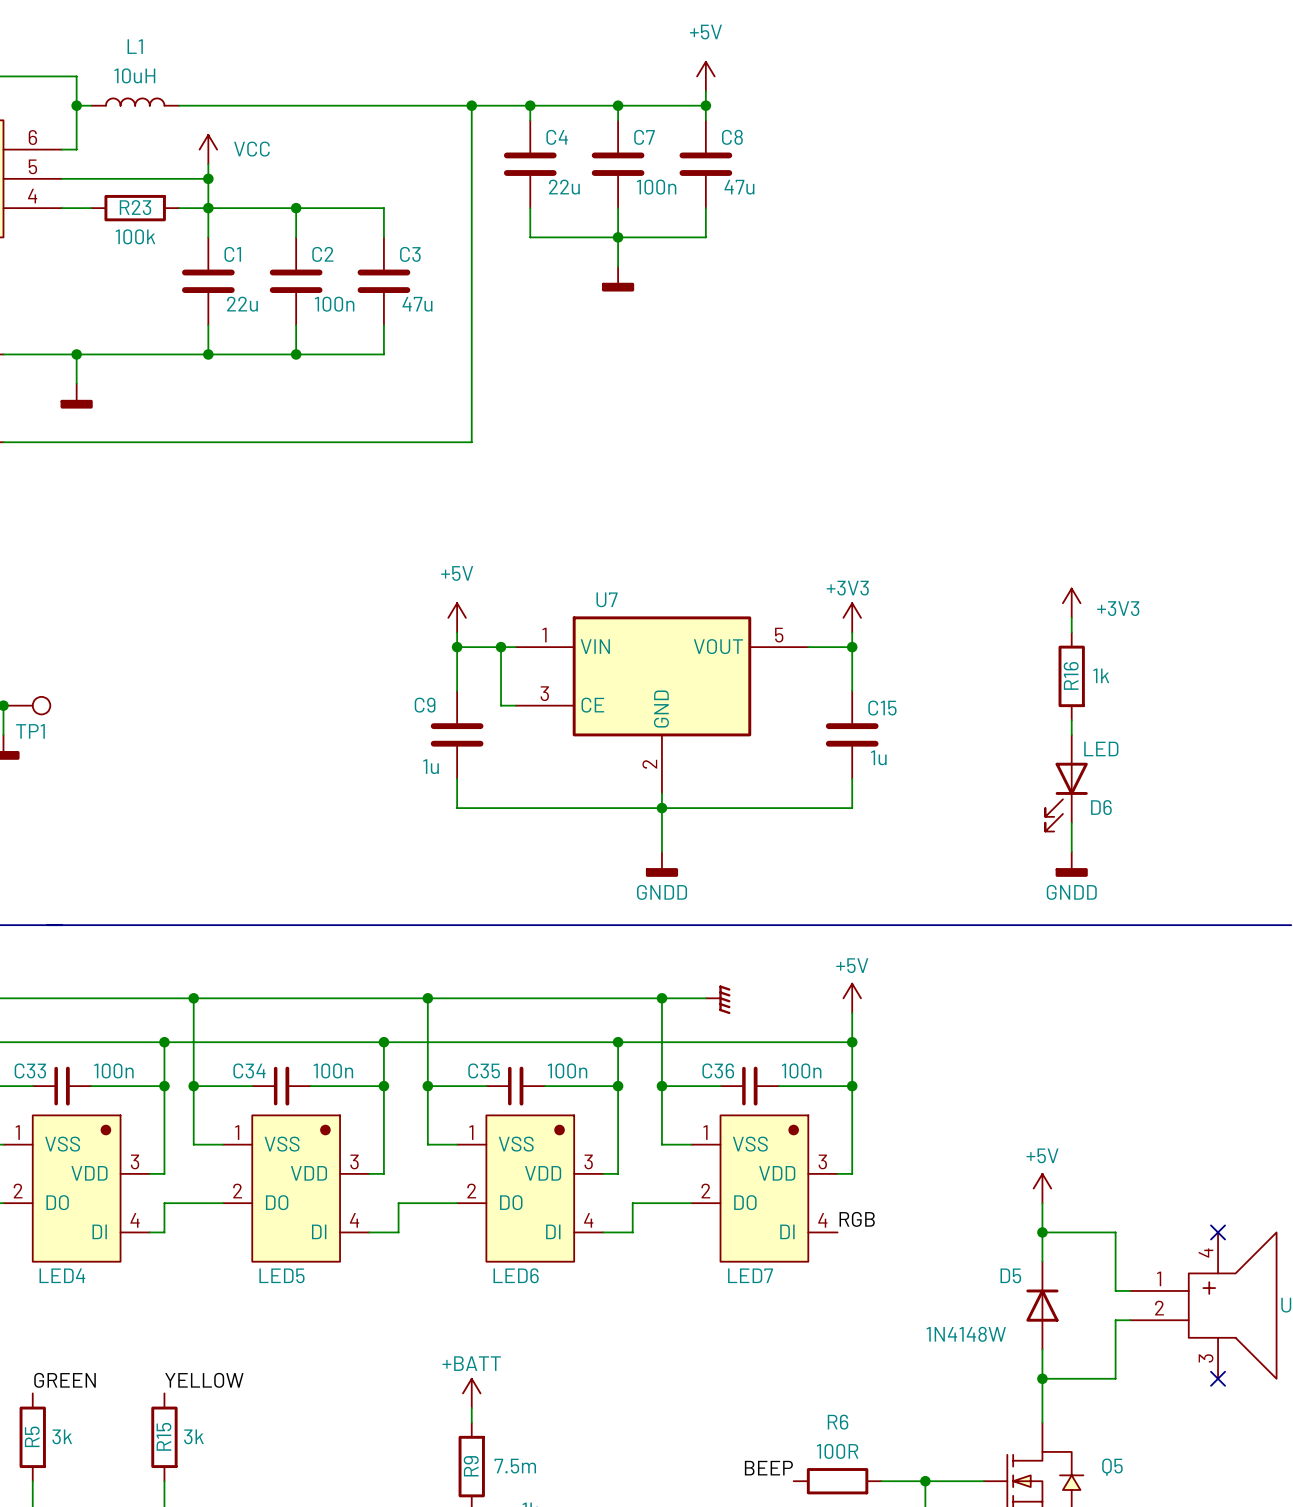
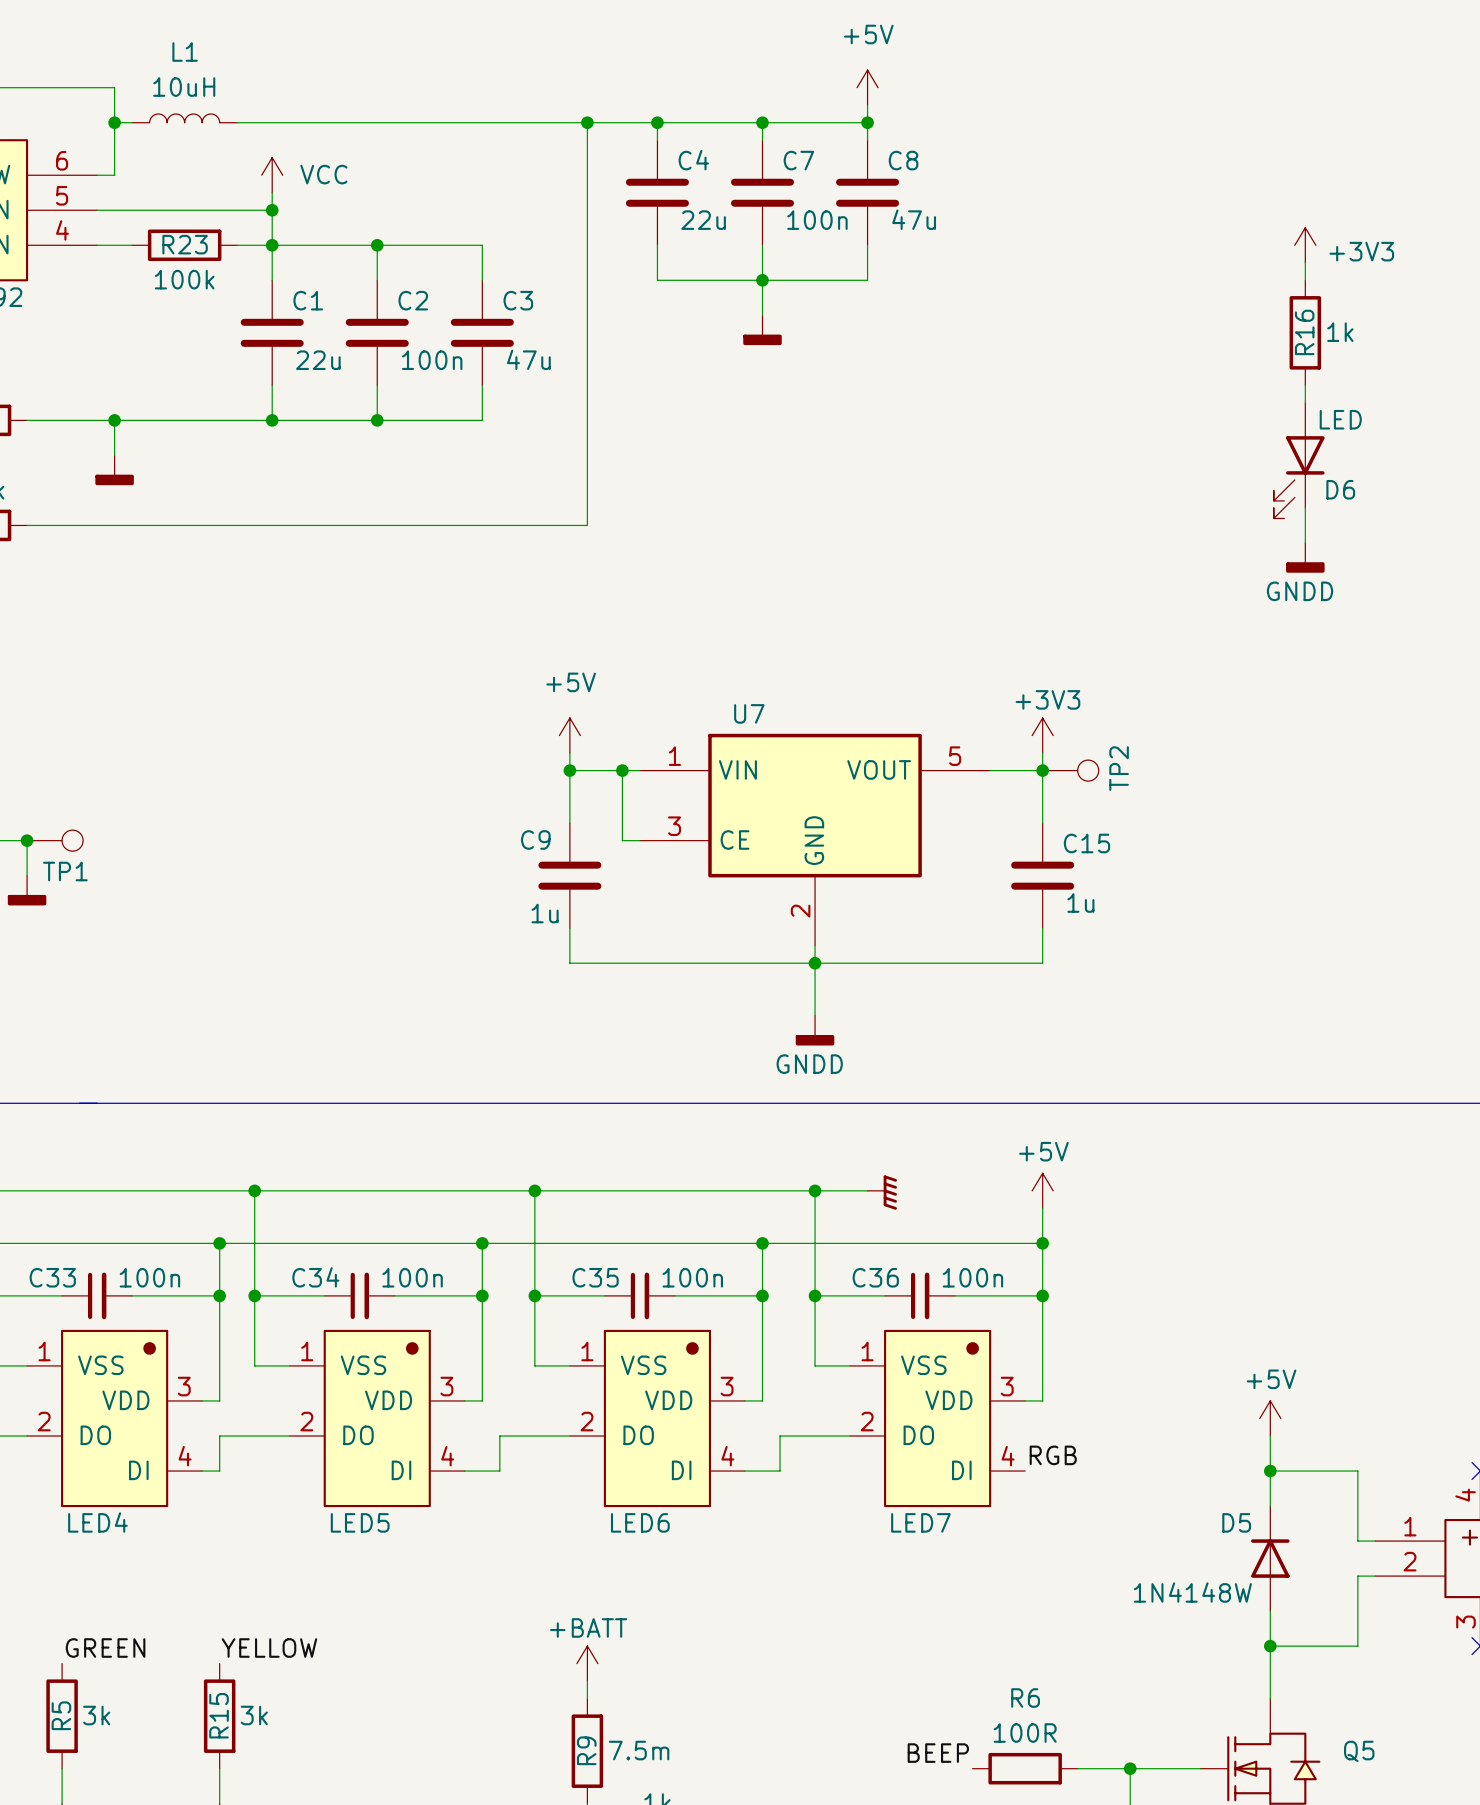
power symbol: none -> +3V3 (1305, 245)
wire: none -> (1305, 262) (1305, 280)
wire: none -> (1305, 385) (1305, 402)
wire: none -> (1305, 507) (1305, 542)
power symbol: none -> GNDD (1305, 557)
power symbol: +3V3 (1071, 603) -> none
wire: (1071, 617) (1071, 632) -> none
TP2: none -> (1070, 770)
R16 position: (1071, 676) -> (1305, 332)
wire: (1071, 720) (1071, 734) -> none
D6 position: (1066, 783) -> (1299, 460)
wire: (1071, 822) (1071, 851) -> none
power symbol: GNDD (1071, 864) -> none

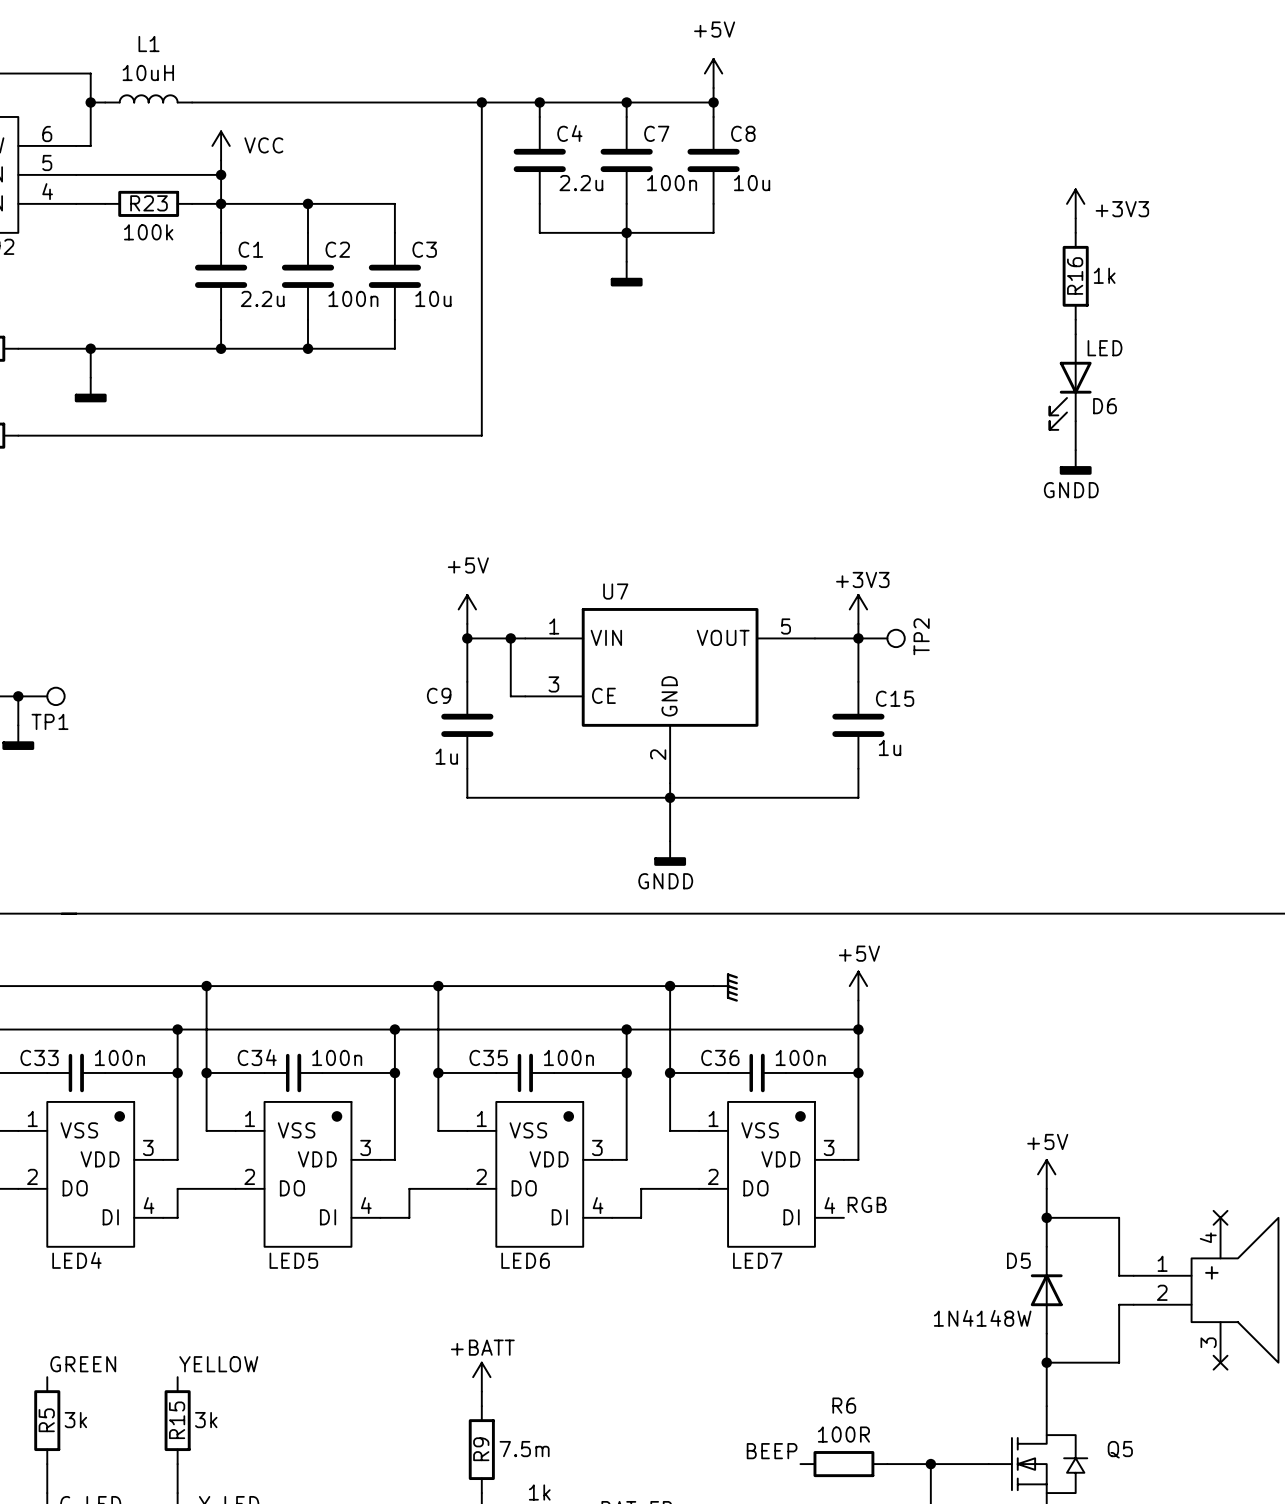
C8 value: 47u (914, 219) -> 10u (752, 183)
C4 value: 22u (703, 220) -> 2.2u (581, 183)
C3 value: 47u (528, 359) -> 10u (433, 298)
C1 value: 22u (318, 360) -> 2.2u (262, 298)

